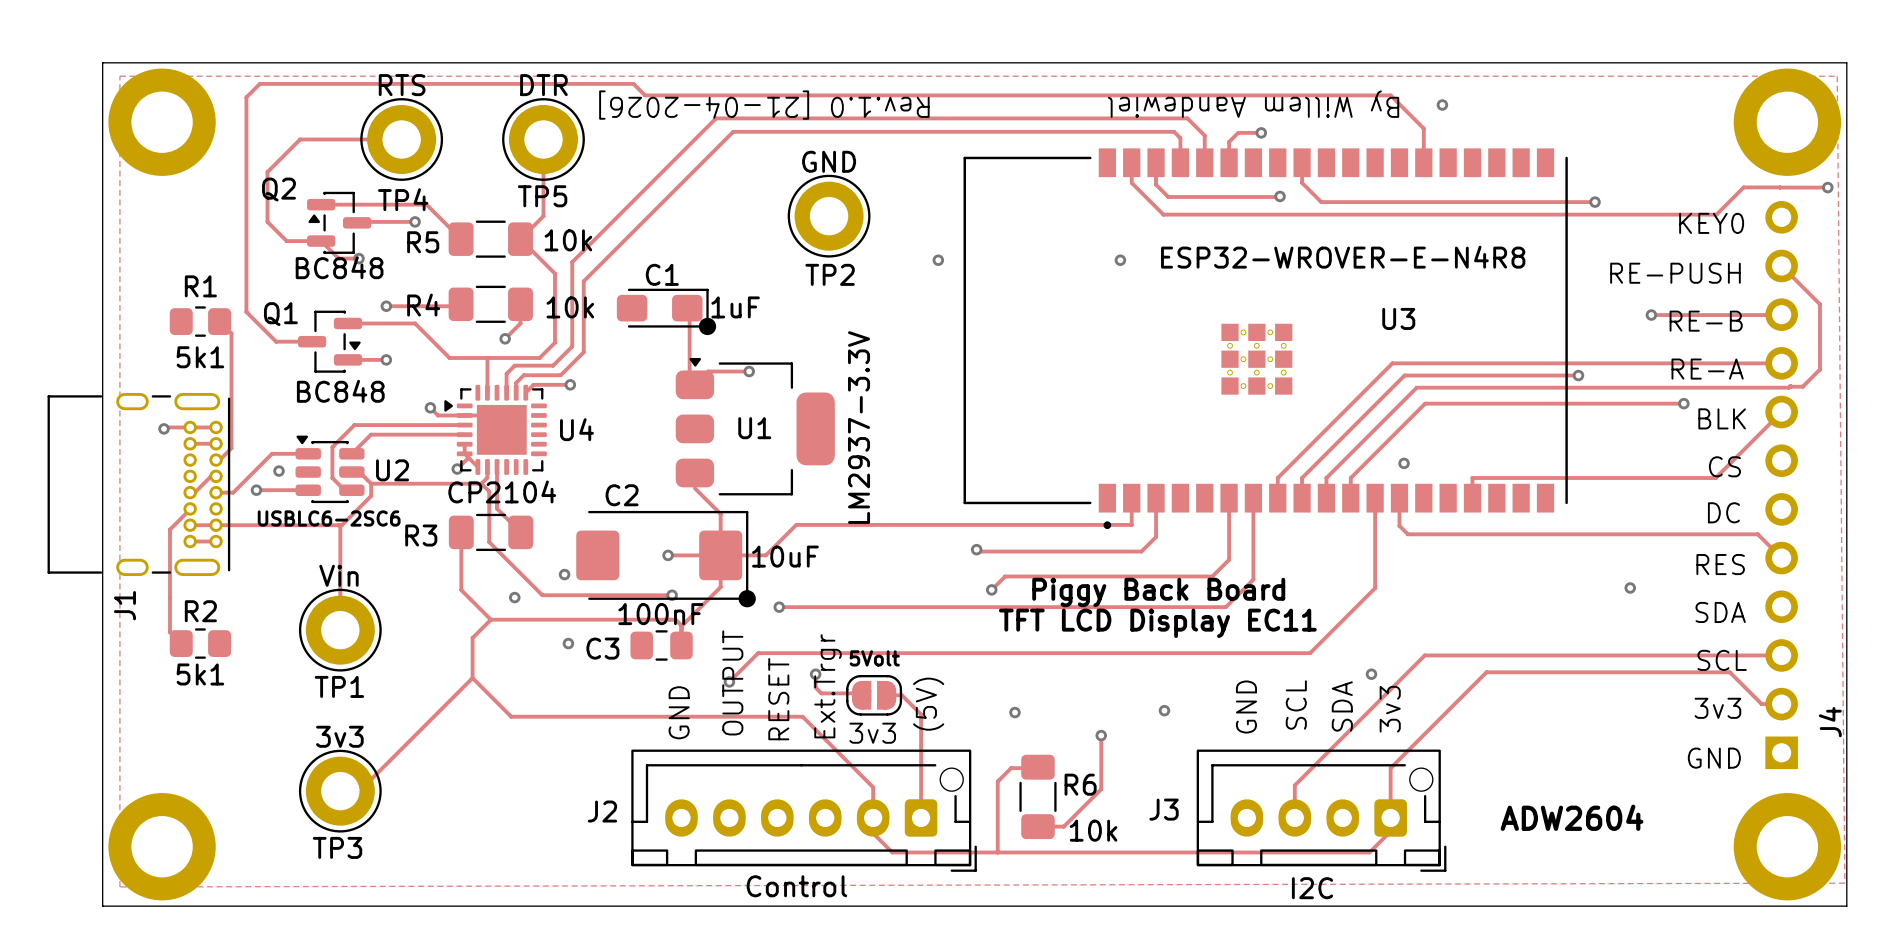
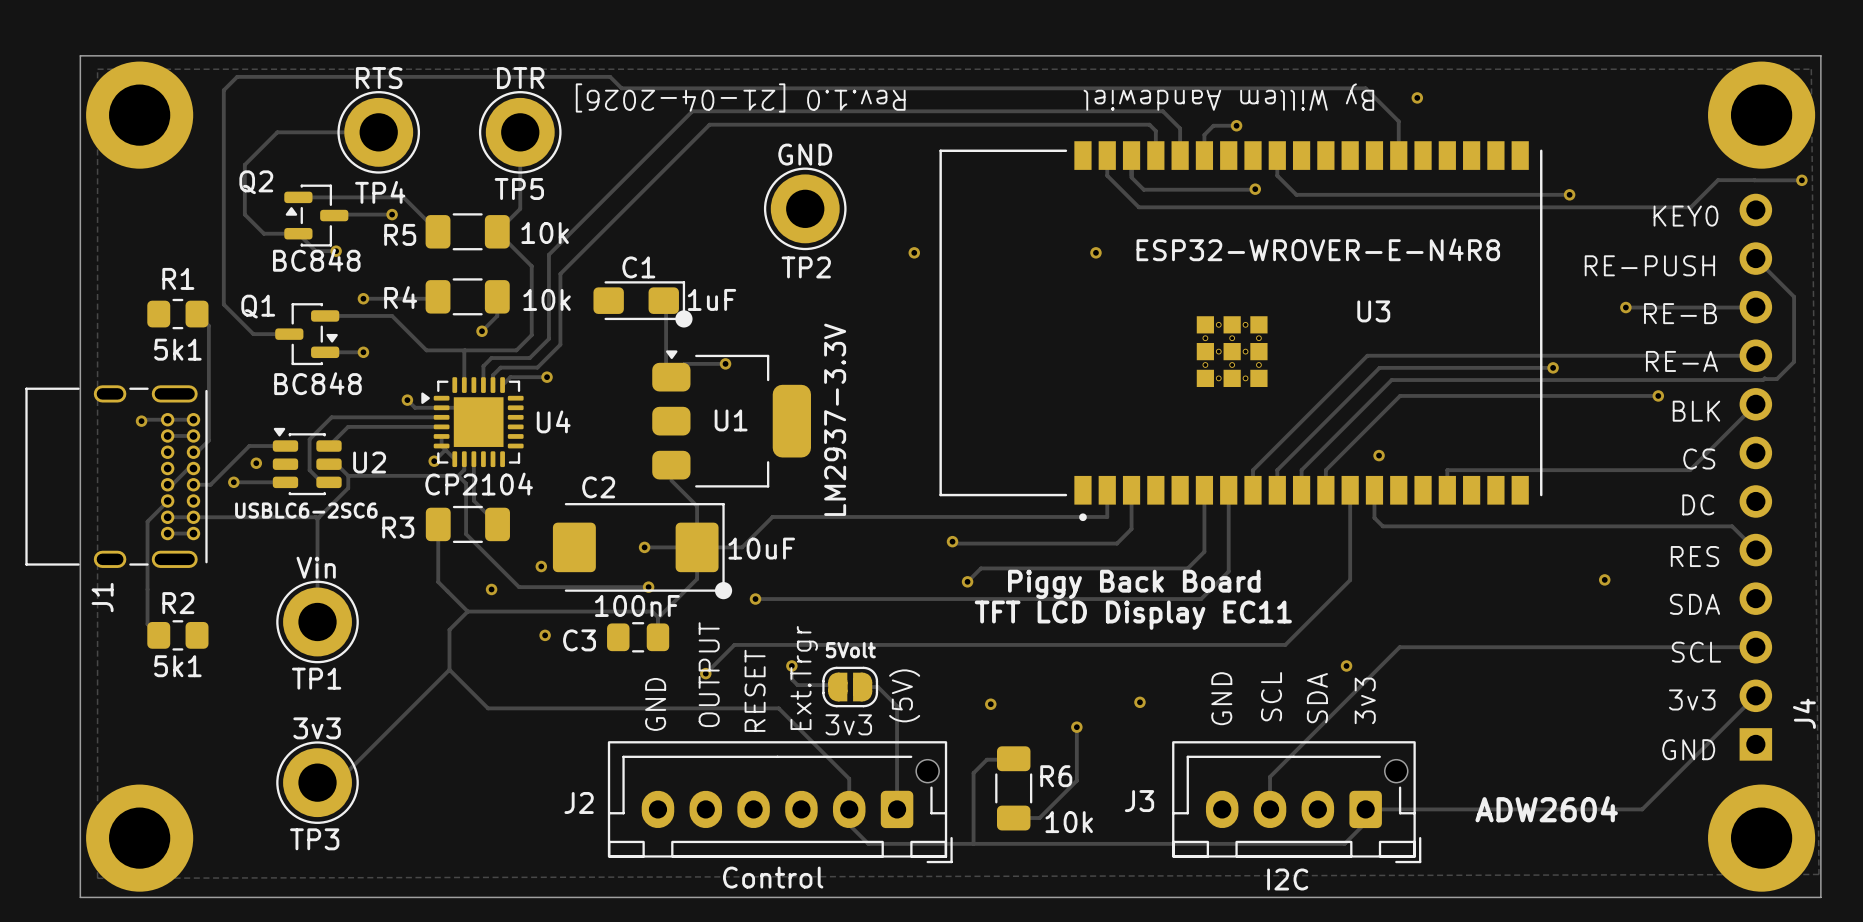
track: (1781, 704) (1761, 704) (1729, 672) (1486, 672) (1390, 768) (1390, 817) -> (1755, 695) (1642, 809) (1365, 809)

